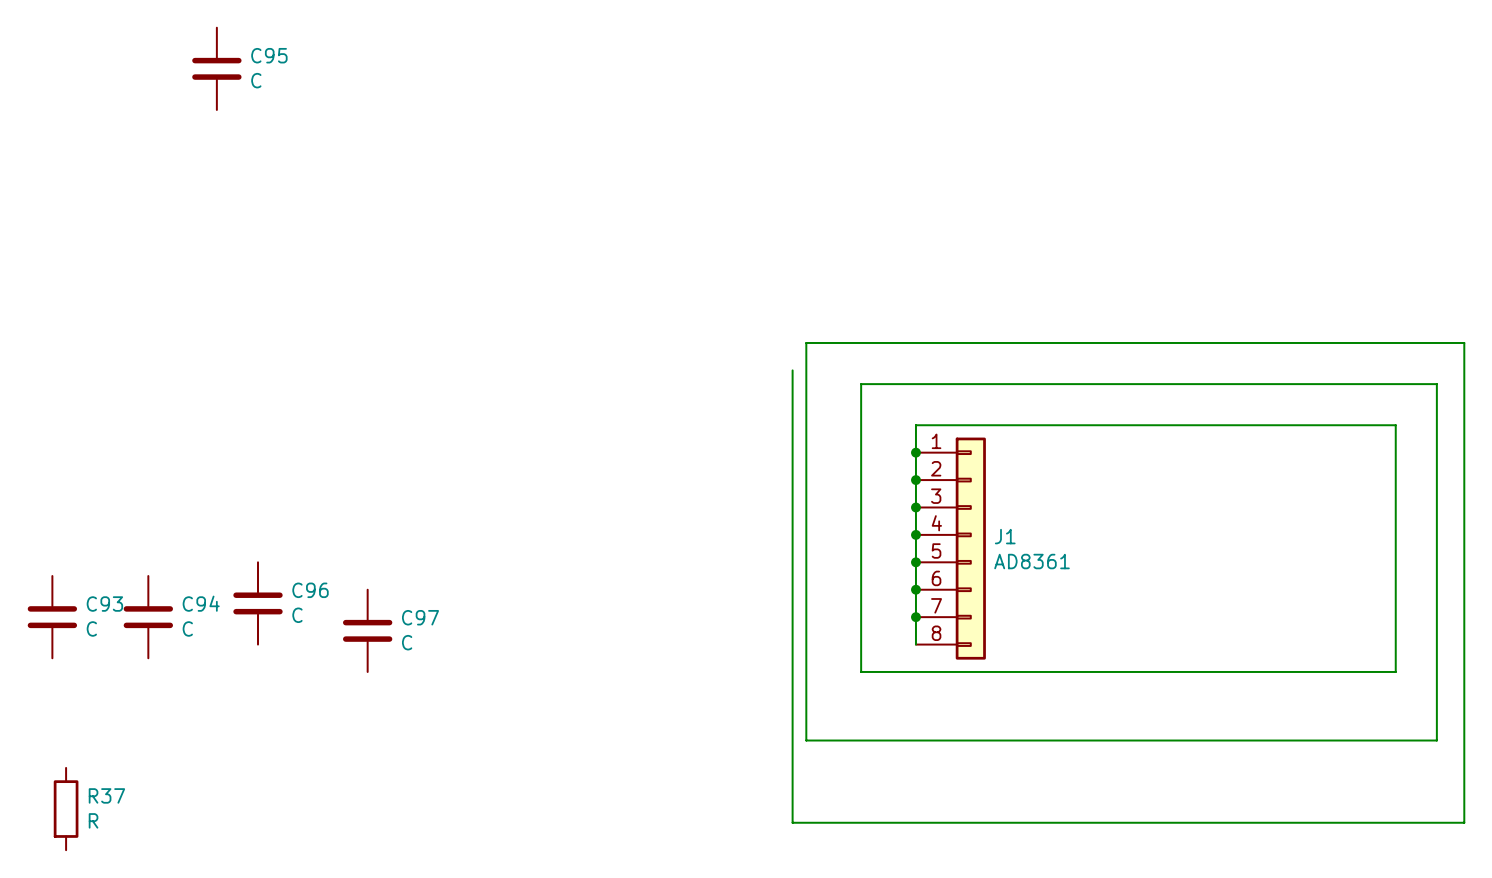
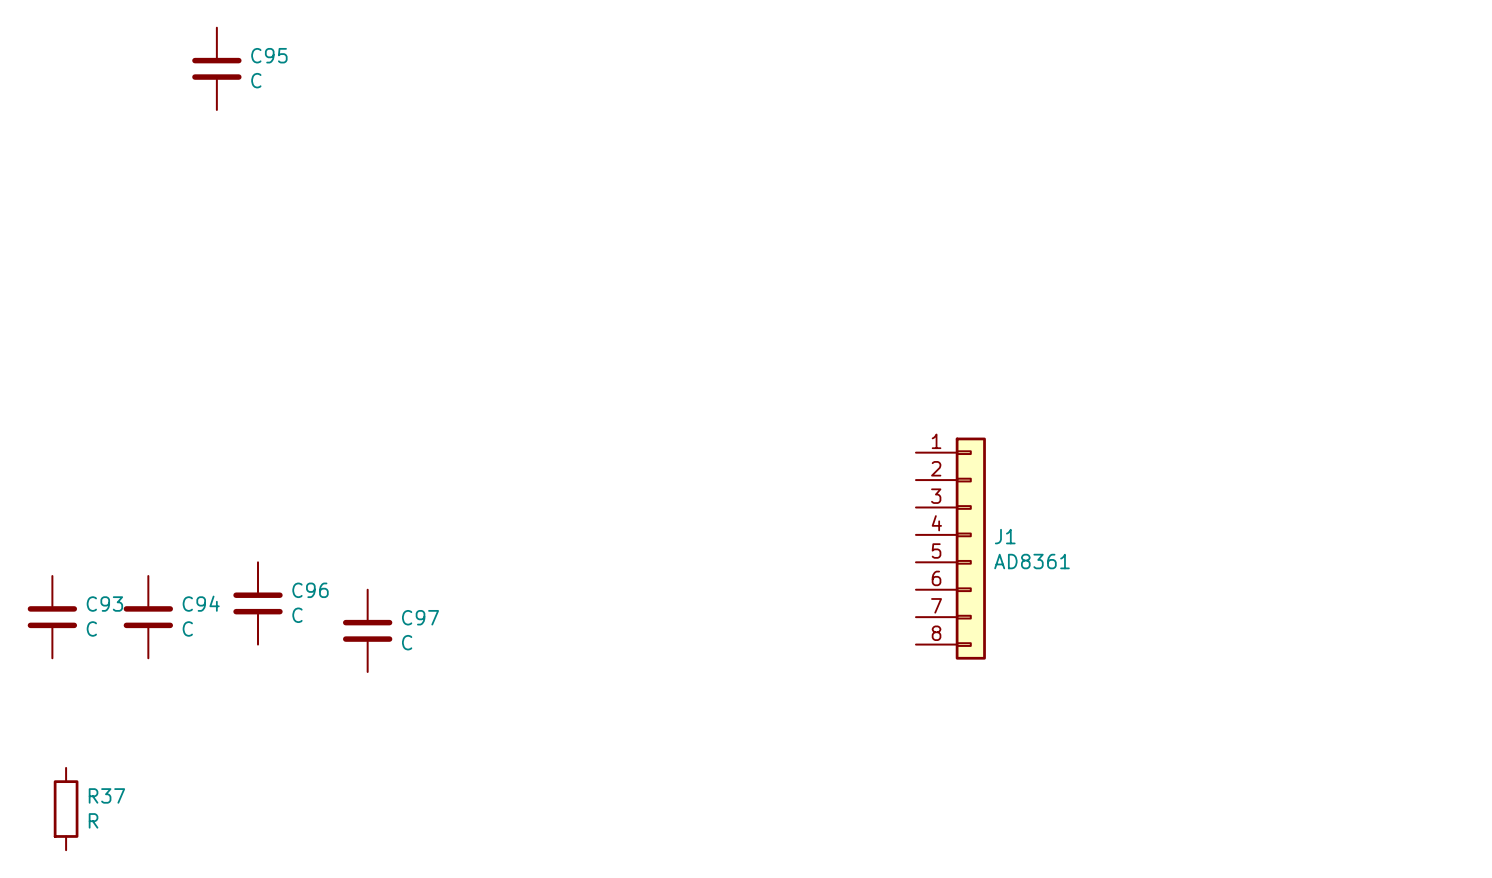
wire: (792, 370) (792, 822) (1464, 822) (1464, 342) (806, 342) (806, 740) (1436, 740) (1436, 384) (861, 384) (861, 671) (1395, 671) (1395, 425) (915, 425) (915, 644) -> none
junction: (915, 452) -> none
junction: (915, 480) -> none
junction: (915, 507) -> none
junction: (915, 534) -> none
junction: (915, 562) -> none
junction: (915, 589) -> none
junction: (915, 617) -> none

